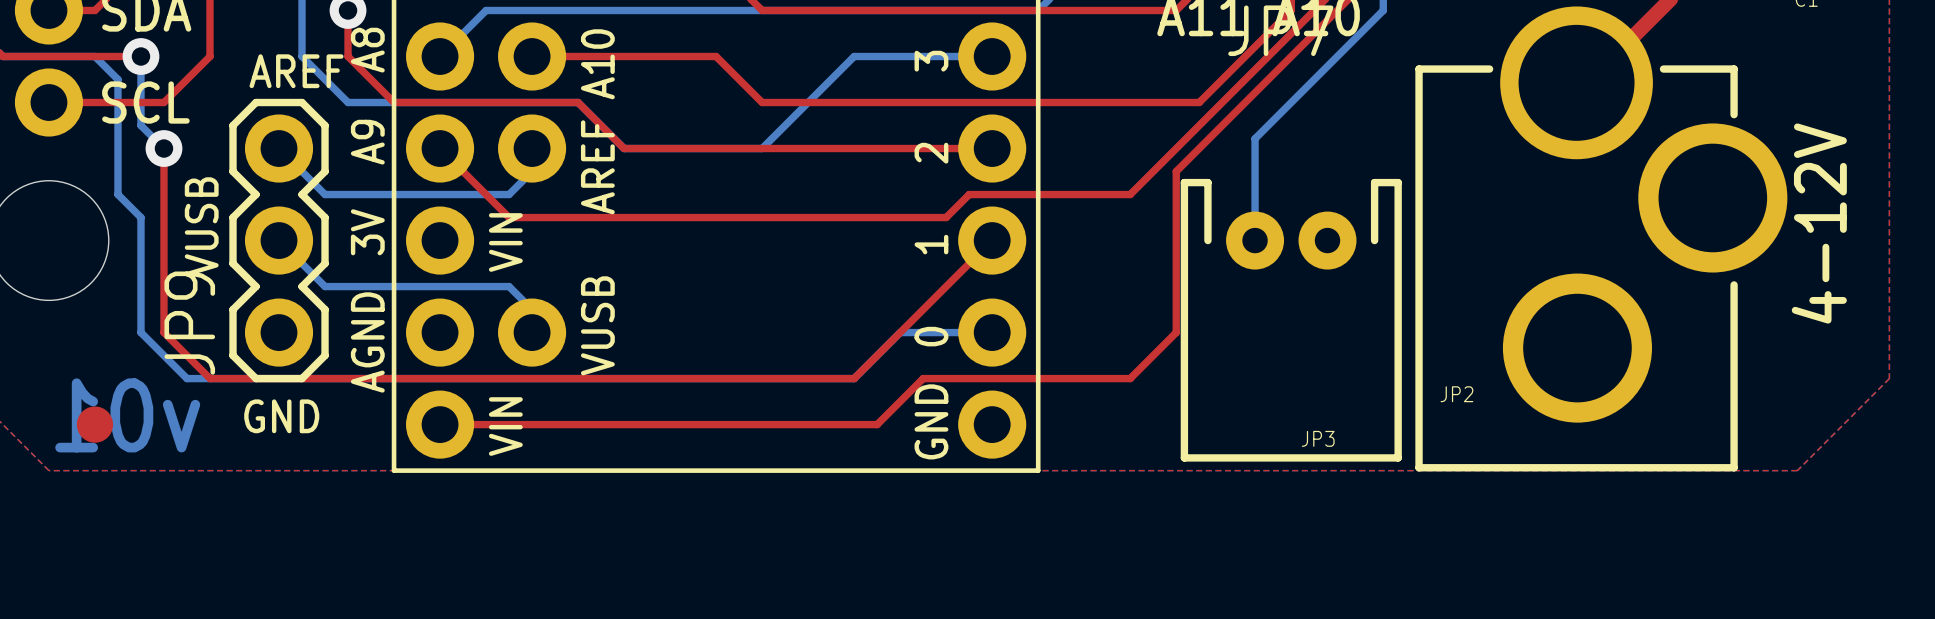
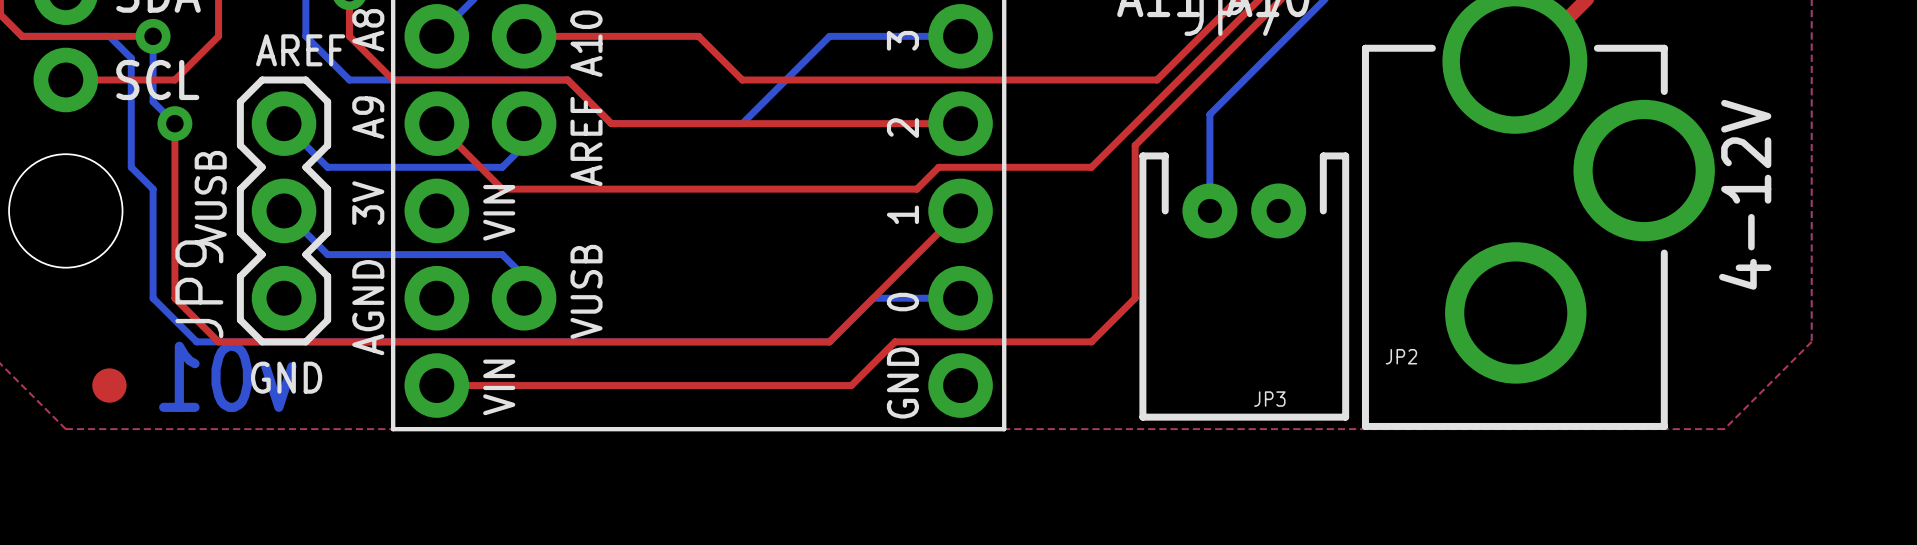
drawing position: (127, 415) -> (227, 376)

